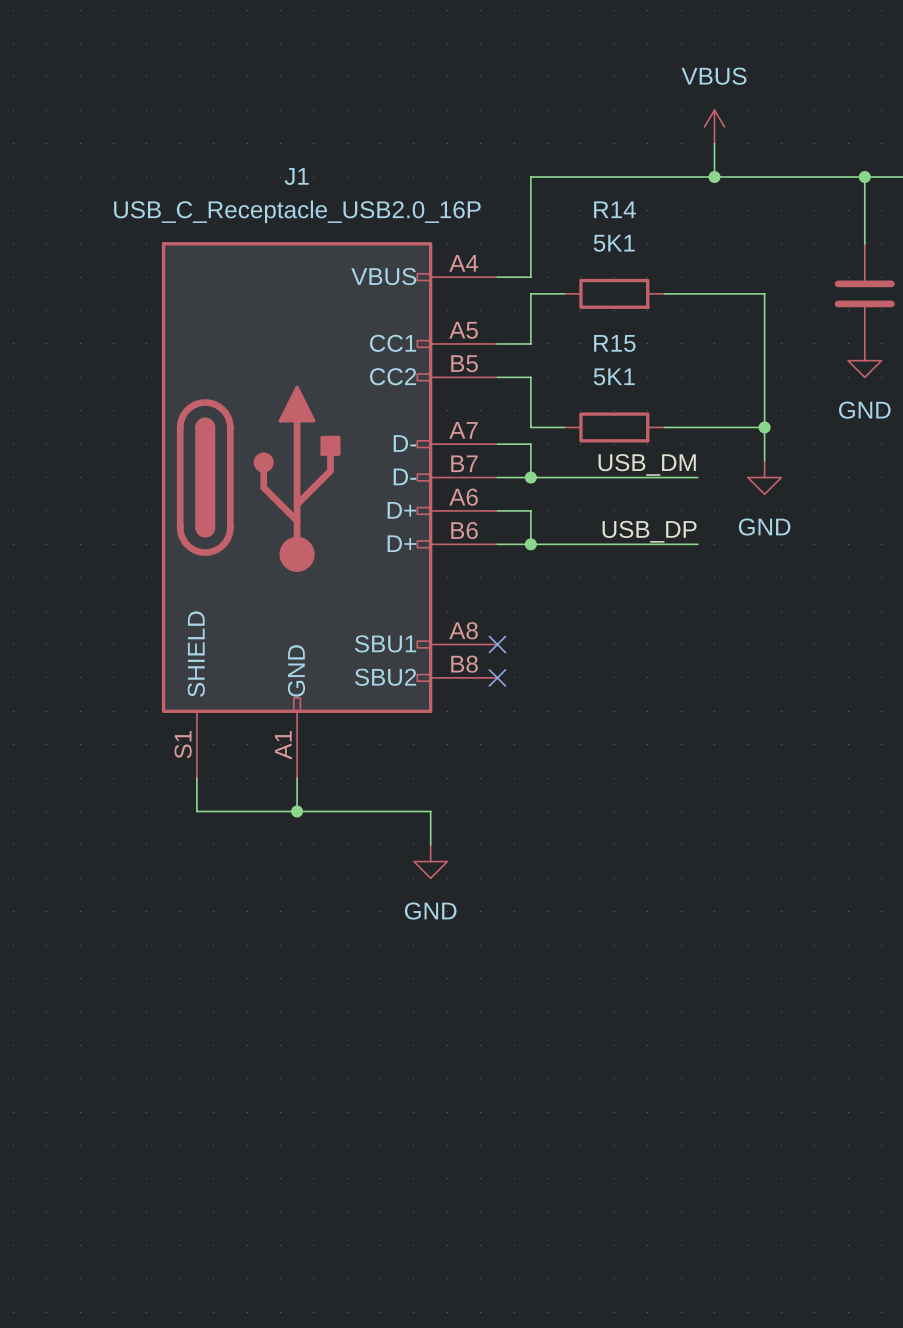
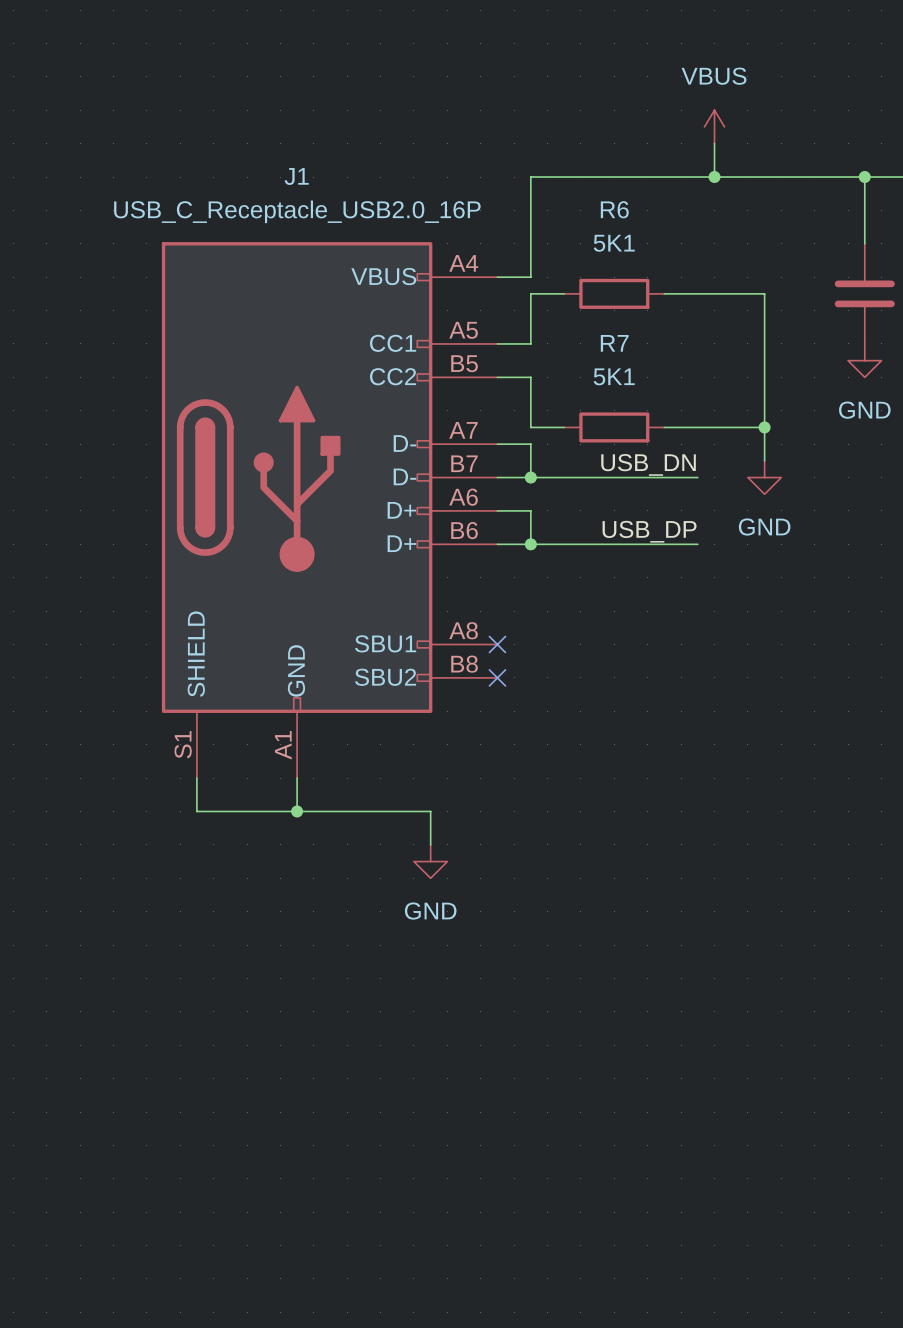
R14 name: R14 (614, 209) -> R6 (614, 209)
R15 name: R15 (614, 343) -> R7 (614, 343)
label: USB_DM (647, 464) -> USB_DN (648, 464)

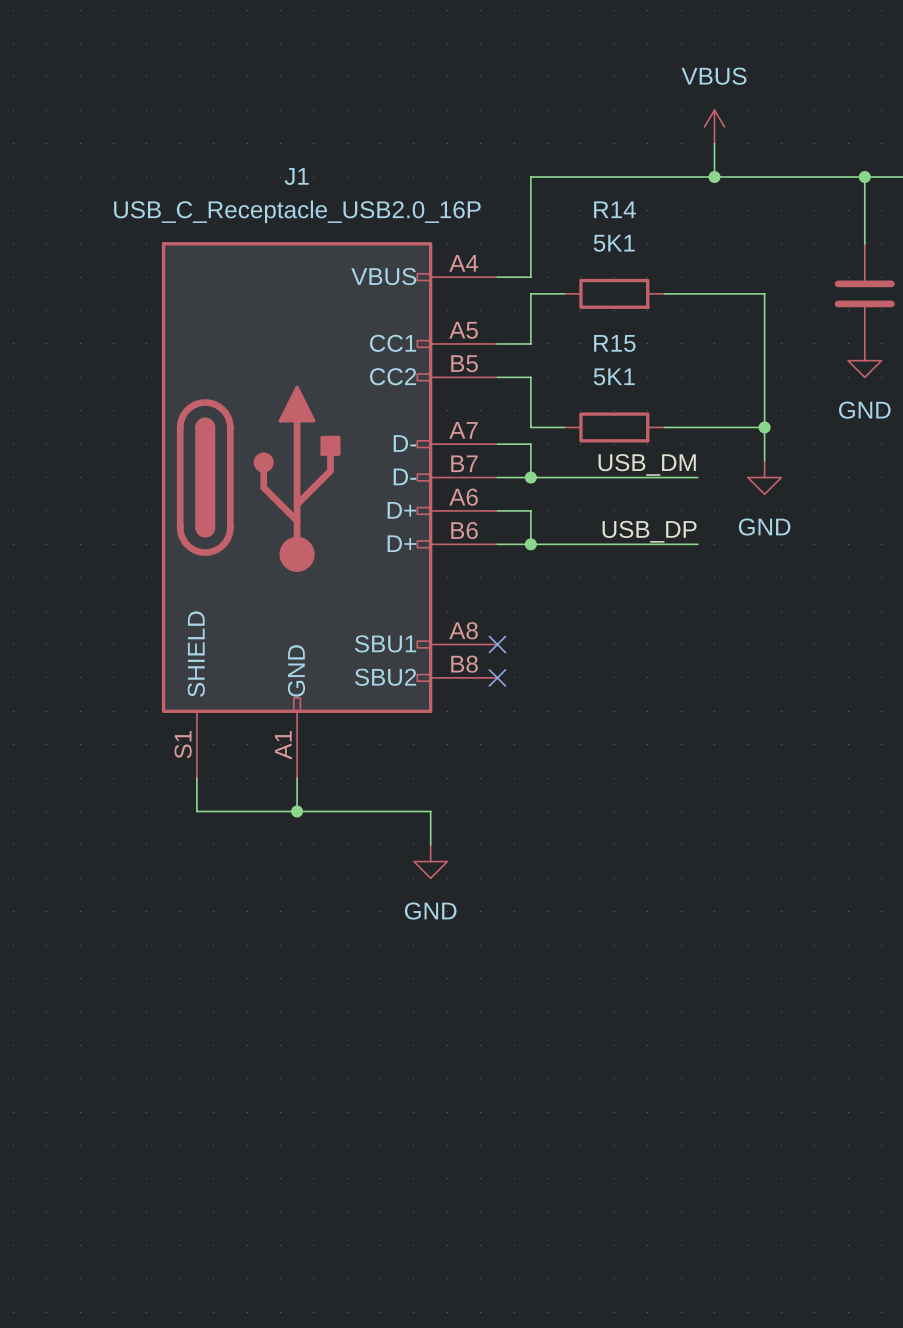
R6 name: R6 (614, 209) -> R14 (614, 209)
R7 name: R7 (614, 343) -> R15 (614, 343)
label: USB_DN (648, 464) -> USB_DM (647, 464)

